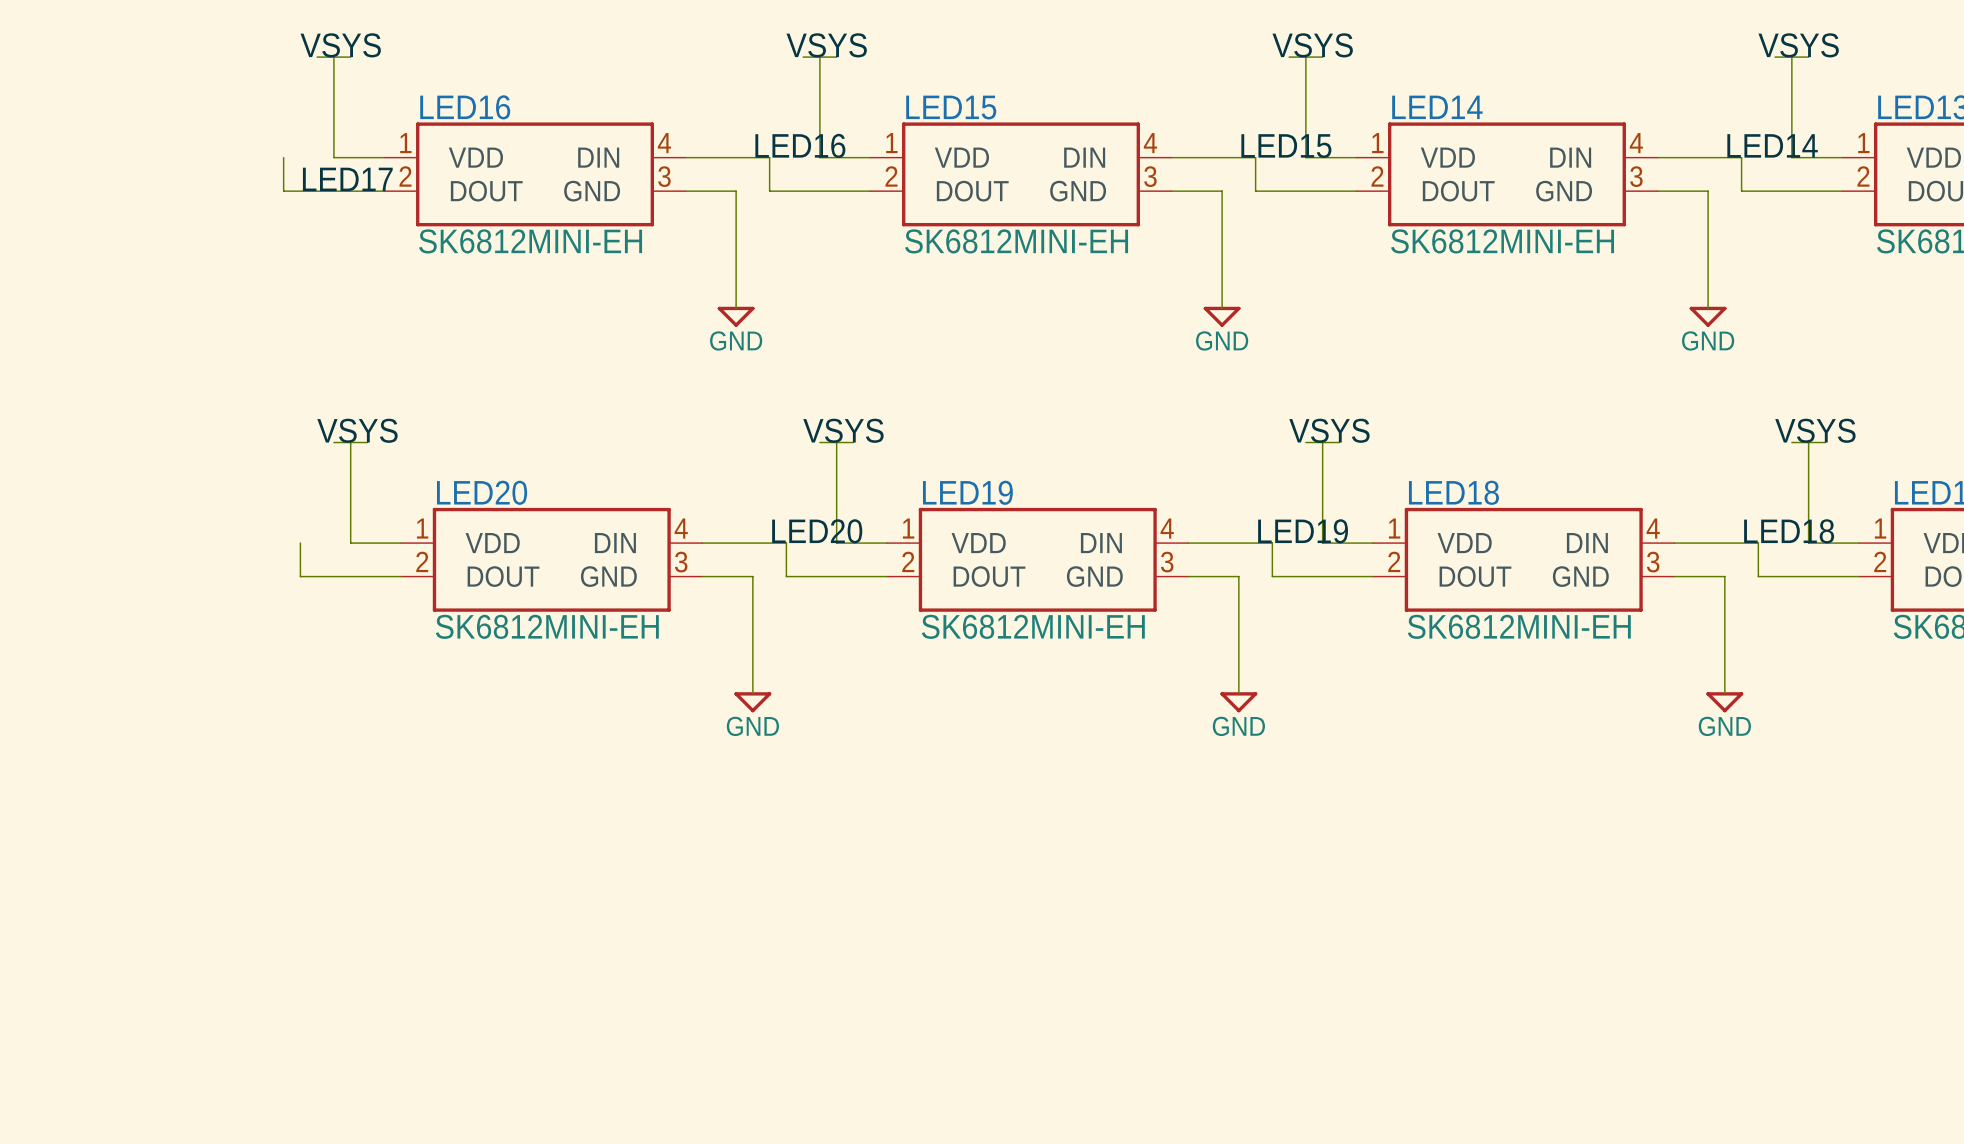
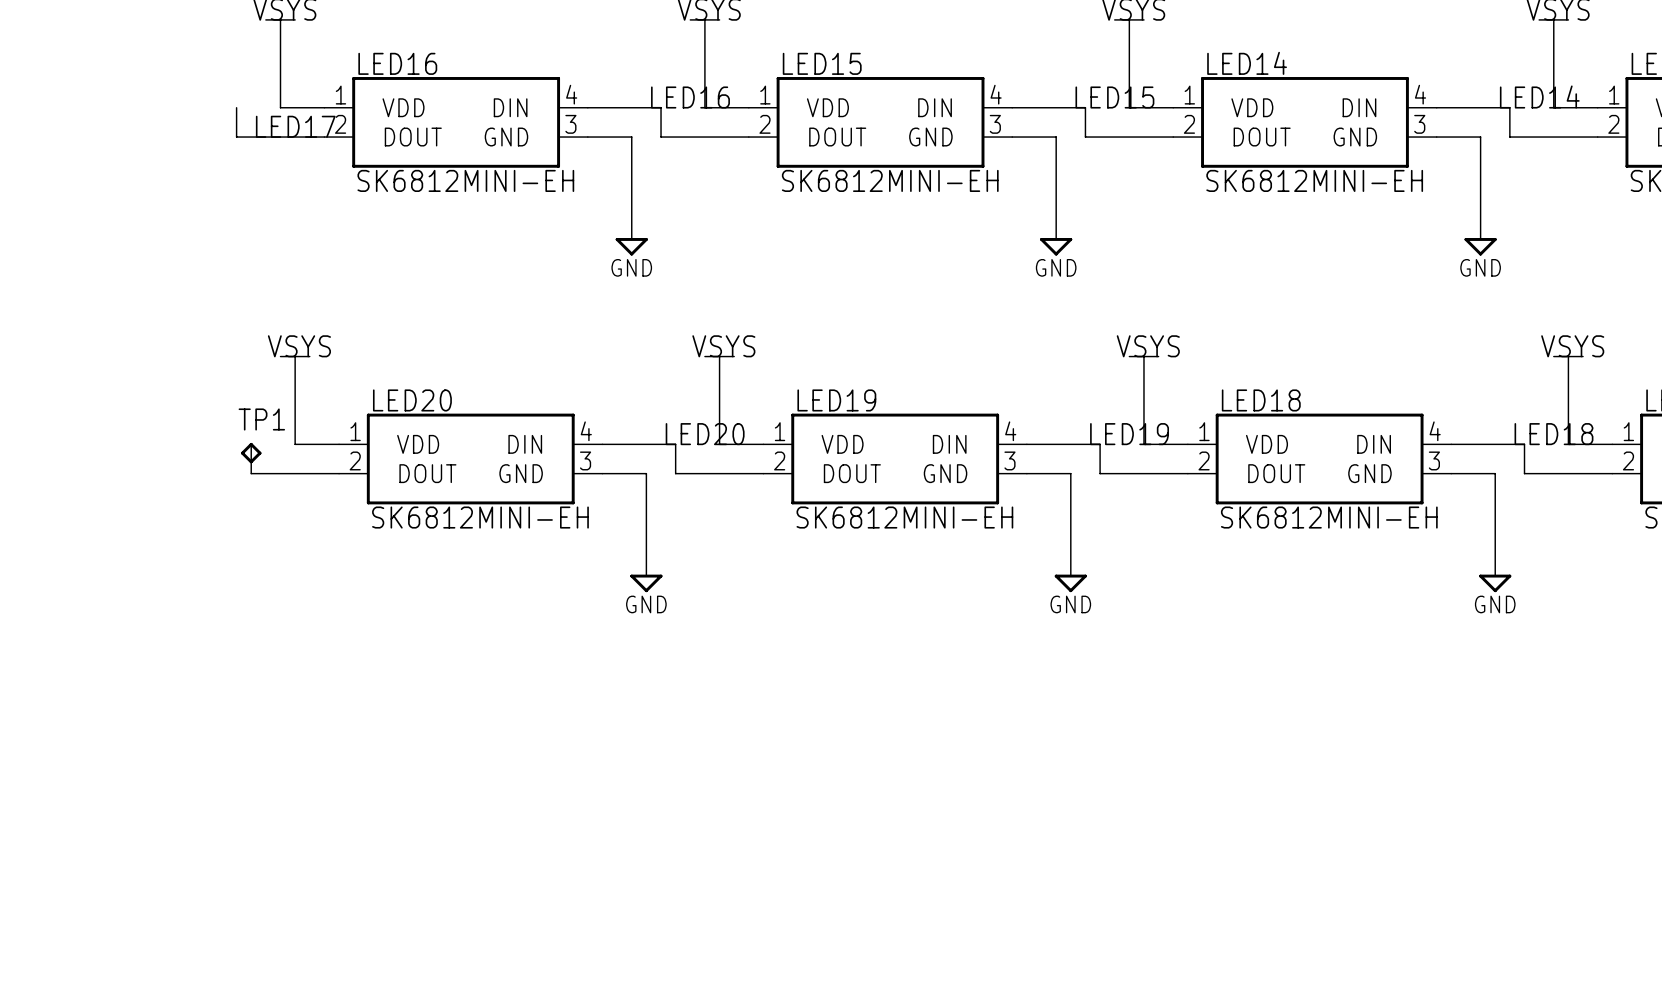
TP1: none -> (251, 458)

